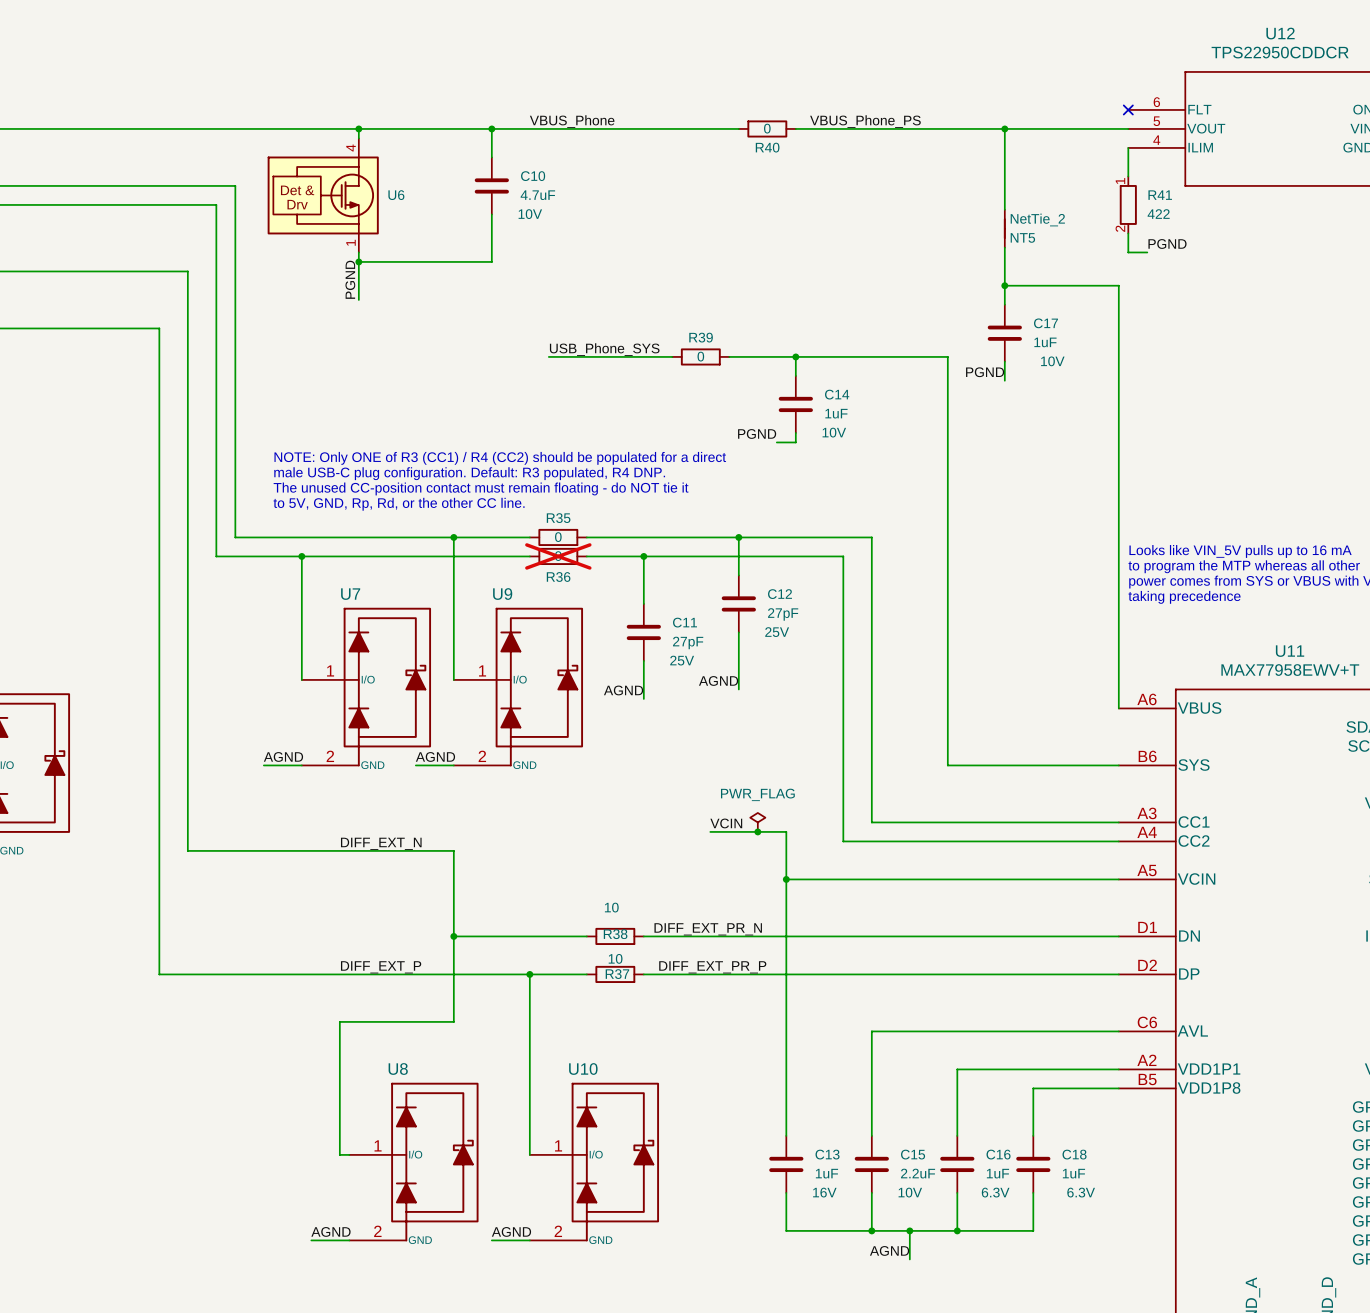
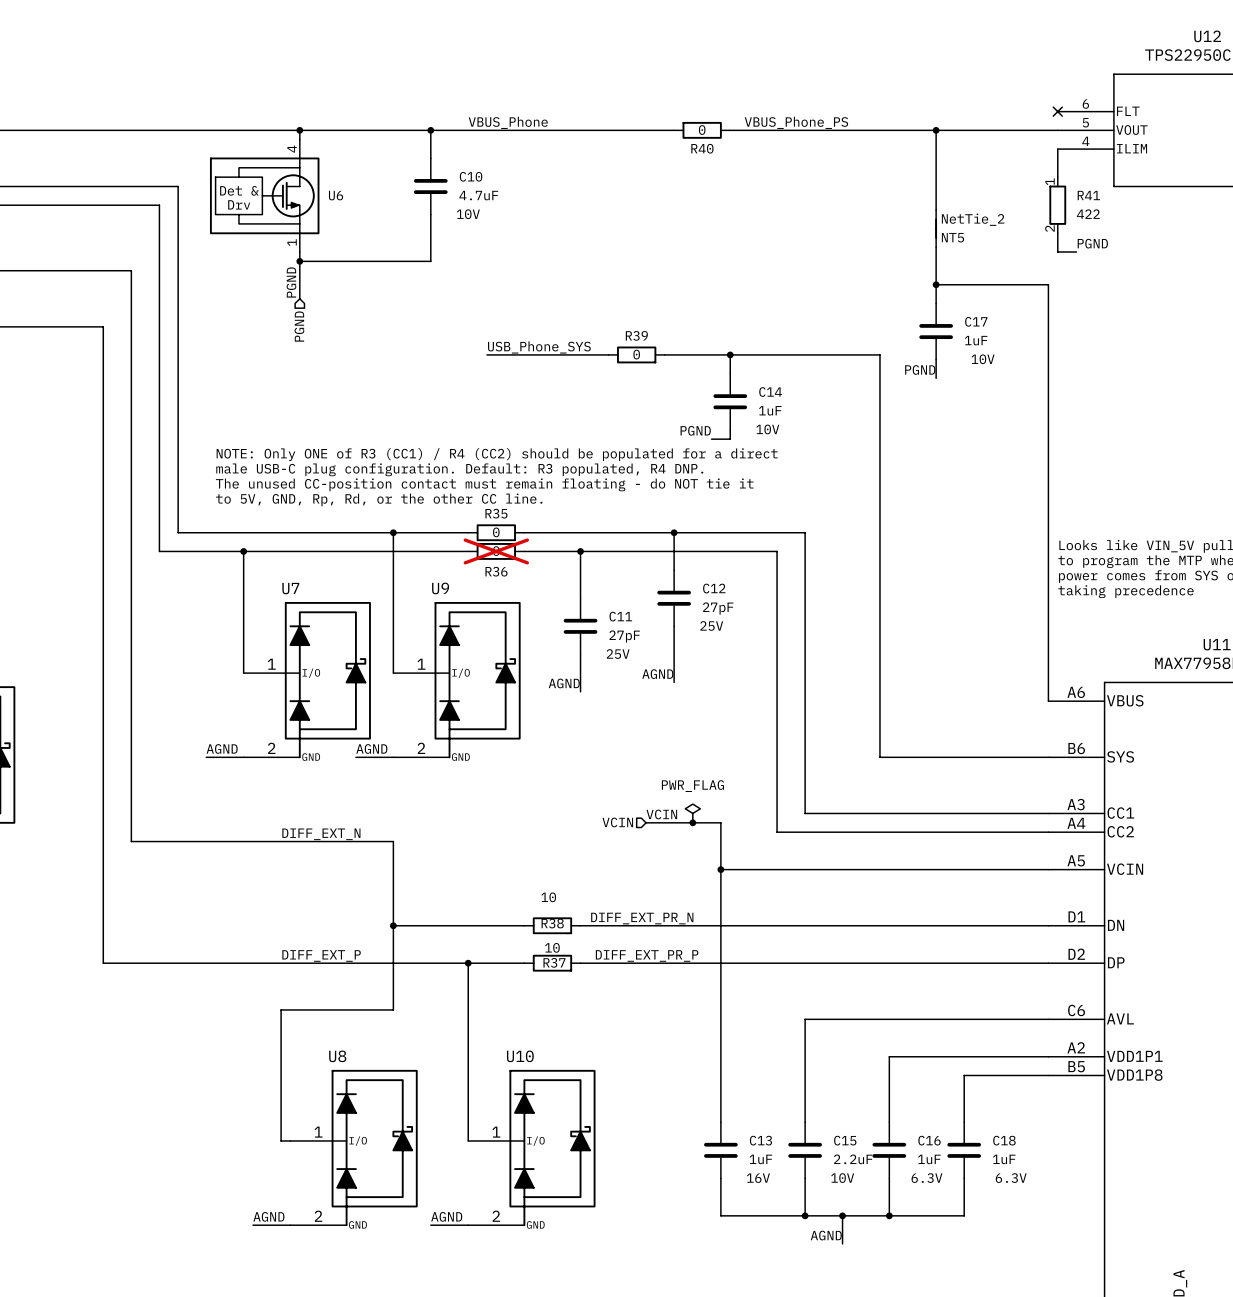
hierarchical label: none -> PGND (299, 326)
hierarchical label: none -> VCIN (617, 822)

